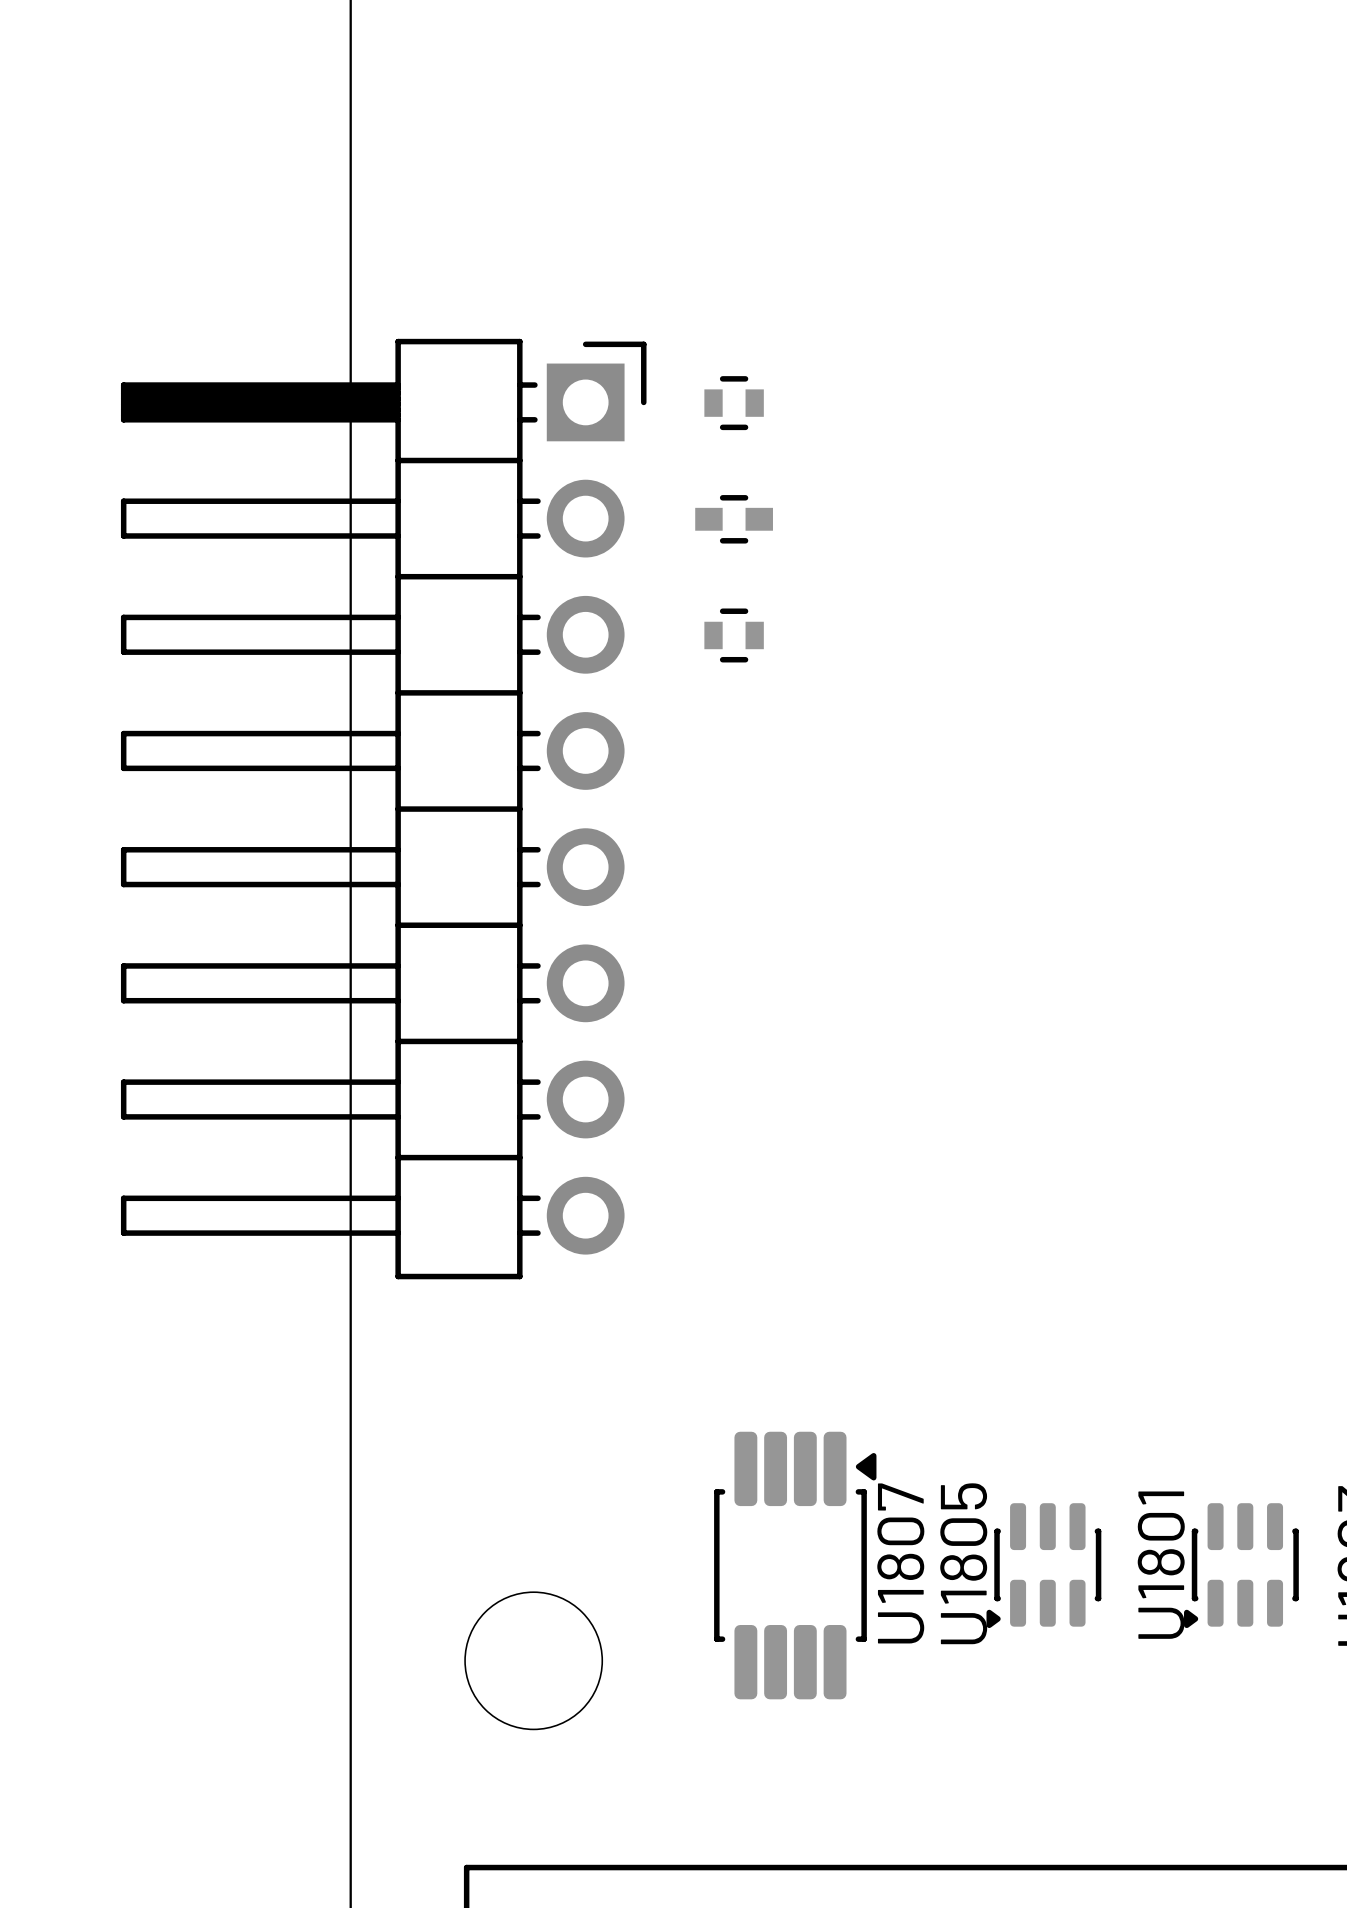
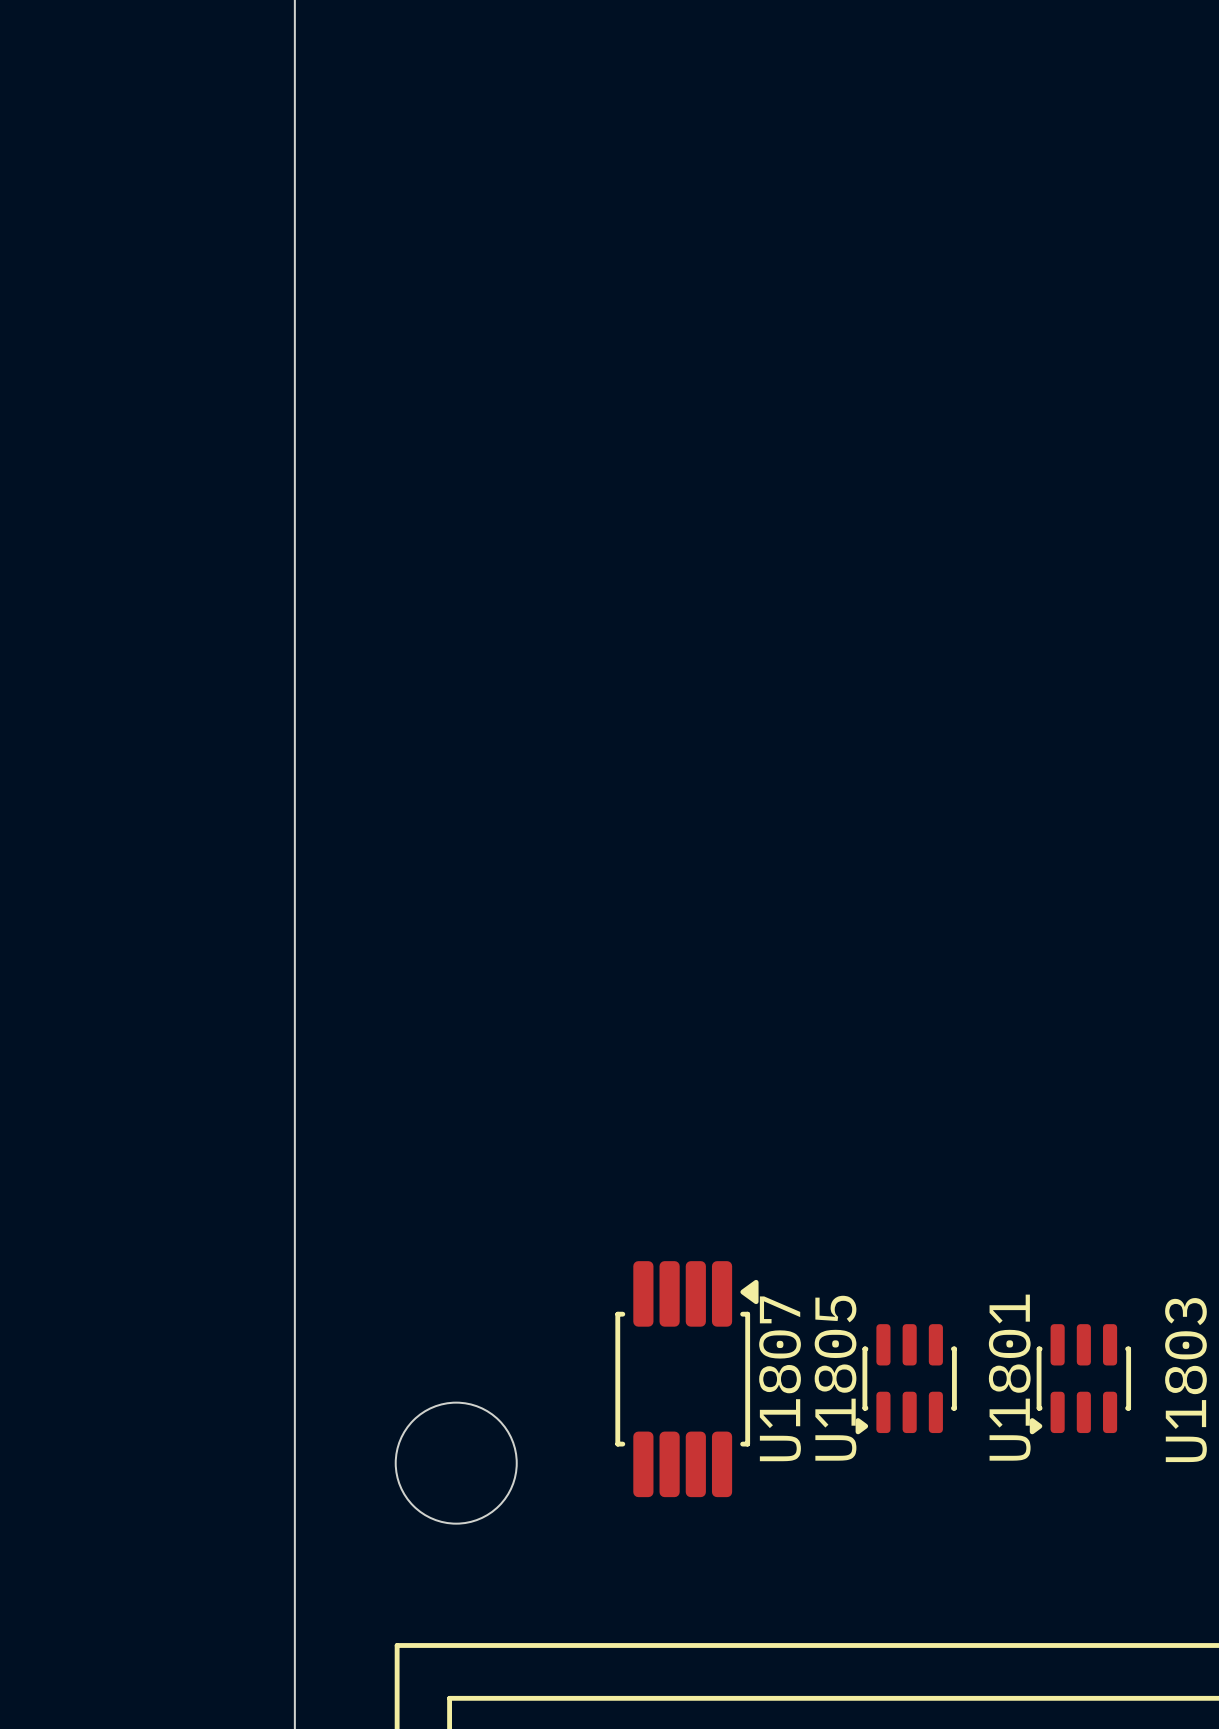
part: (734, 403) -> none
part: (734, 519) -> none
part: (734, 635) -> none
part: (383, 809) -> none

